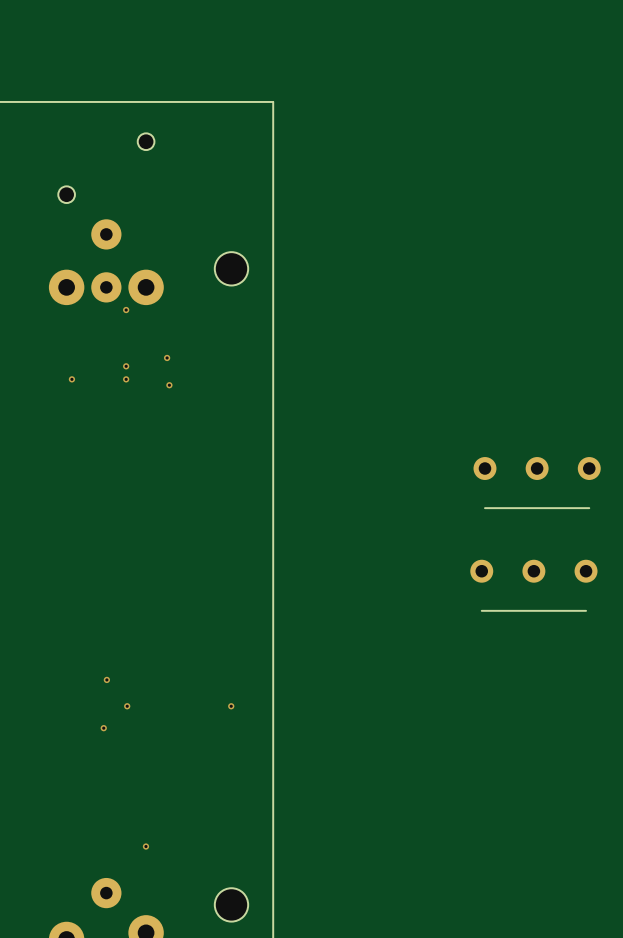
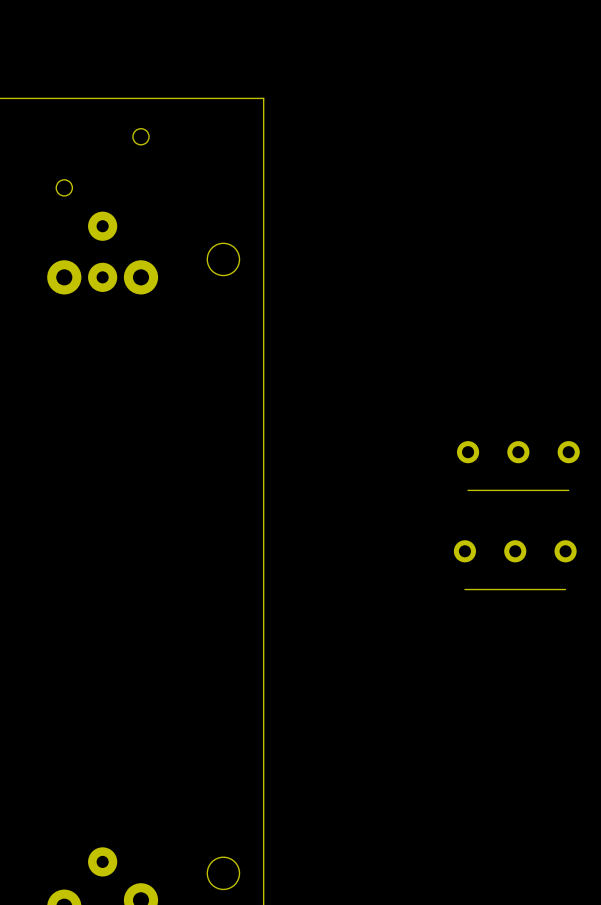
via: (126, 310) -> none
via: (167, 357) -> none
via: (126, 366) -> none
via: (71, 379) -> none
via: (126, 379) -> none
via: (169, 385) -> none
via: (106, 679) -> none
via: (127, 706) -> none
via: (231, 706) -> none
via: (103, 728) -> none
via: (145, 846) -> none

